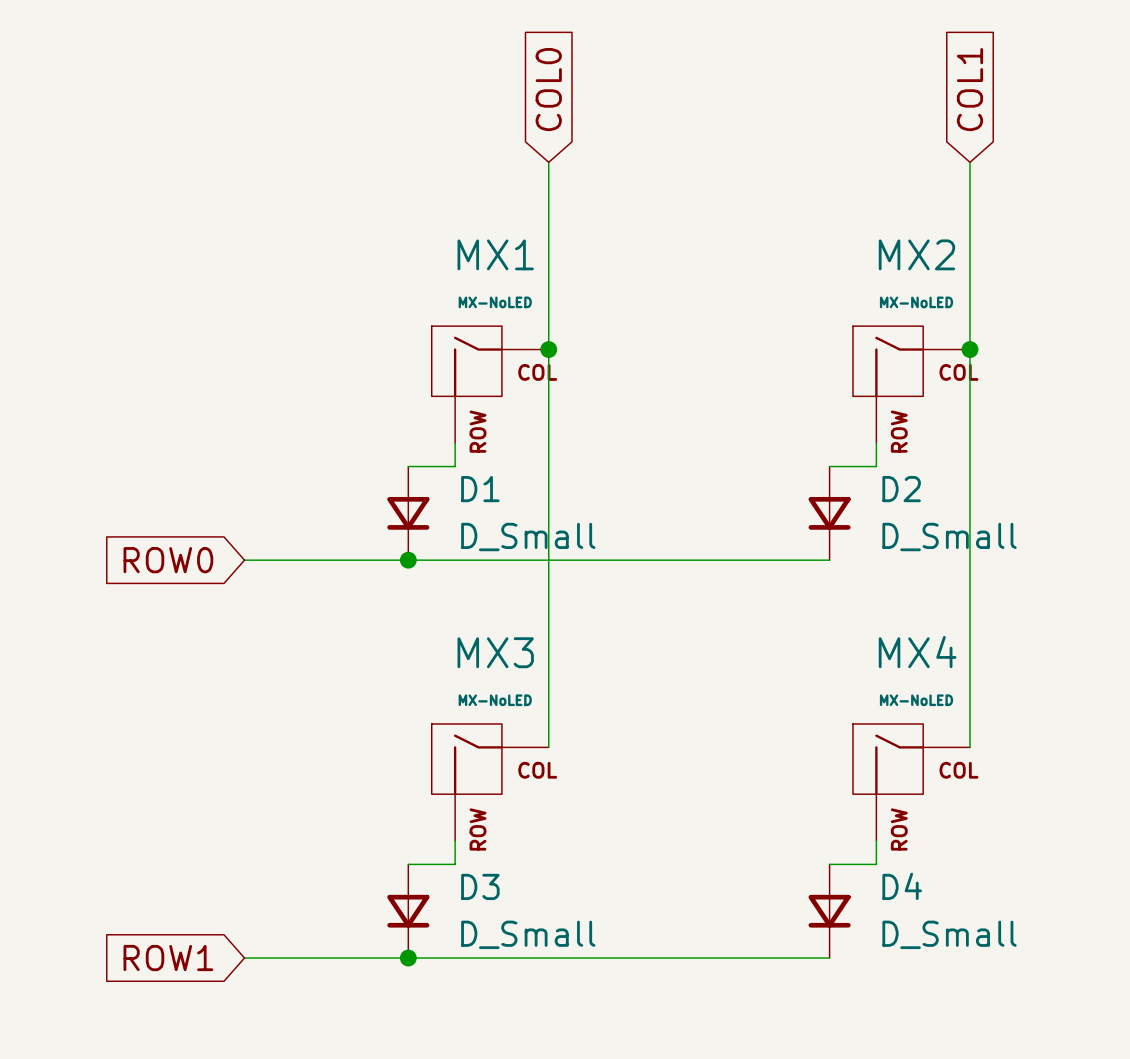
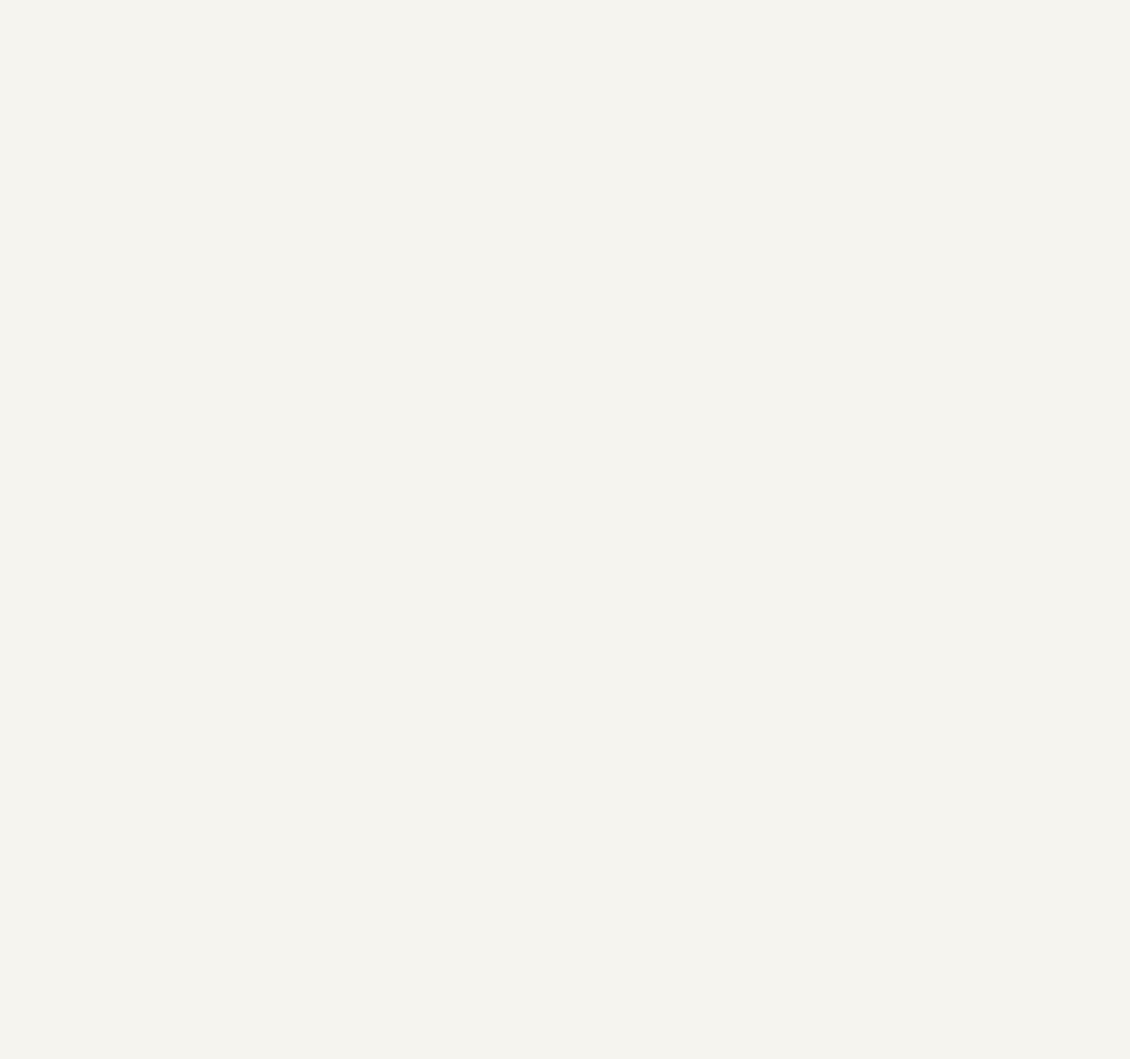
global label: COL0 (548, 89) -> none
global label: COL1 (969, 89) -> none
wire: (548, 162) (548, 747) -> none
wire: (969, 162) (969, 747) -> none
junction: (548, 349) -> none
junction: (969, 349) -> none
MX1: MX-NoLED (490, 384) -> none
MX2: MX-NoLED (911, 384) -> none
wire: (455, 443) (455, 466) (408, 466) -> none
wire: (876, 443) (876, 466) (829, 466) -> none
D1: D_Small (408, 513) -> none
D2: D_Small (829, 513) -> none
global label: ROW0 (168, 560) -> none
wire: (244, 560) (829, 560) -> none
junction: (408, 560) -> none
MX3: MX-NoLED (490, 782) -> none
MX4: MX-NoLED (911, 782) -> none
wire: (455, 841) (455, 864) (408, 864) -> none
wire: (876, 841) (876, 864) (829, 864) -> none
D3: D_Small (408, 911) -> none
D4: D_Small (829, 911) -> none
global label: ROW1 (168, 958) -> none
wire: (244, 958) (829, 958) -> none
junction: (408, 958) -> none

